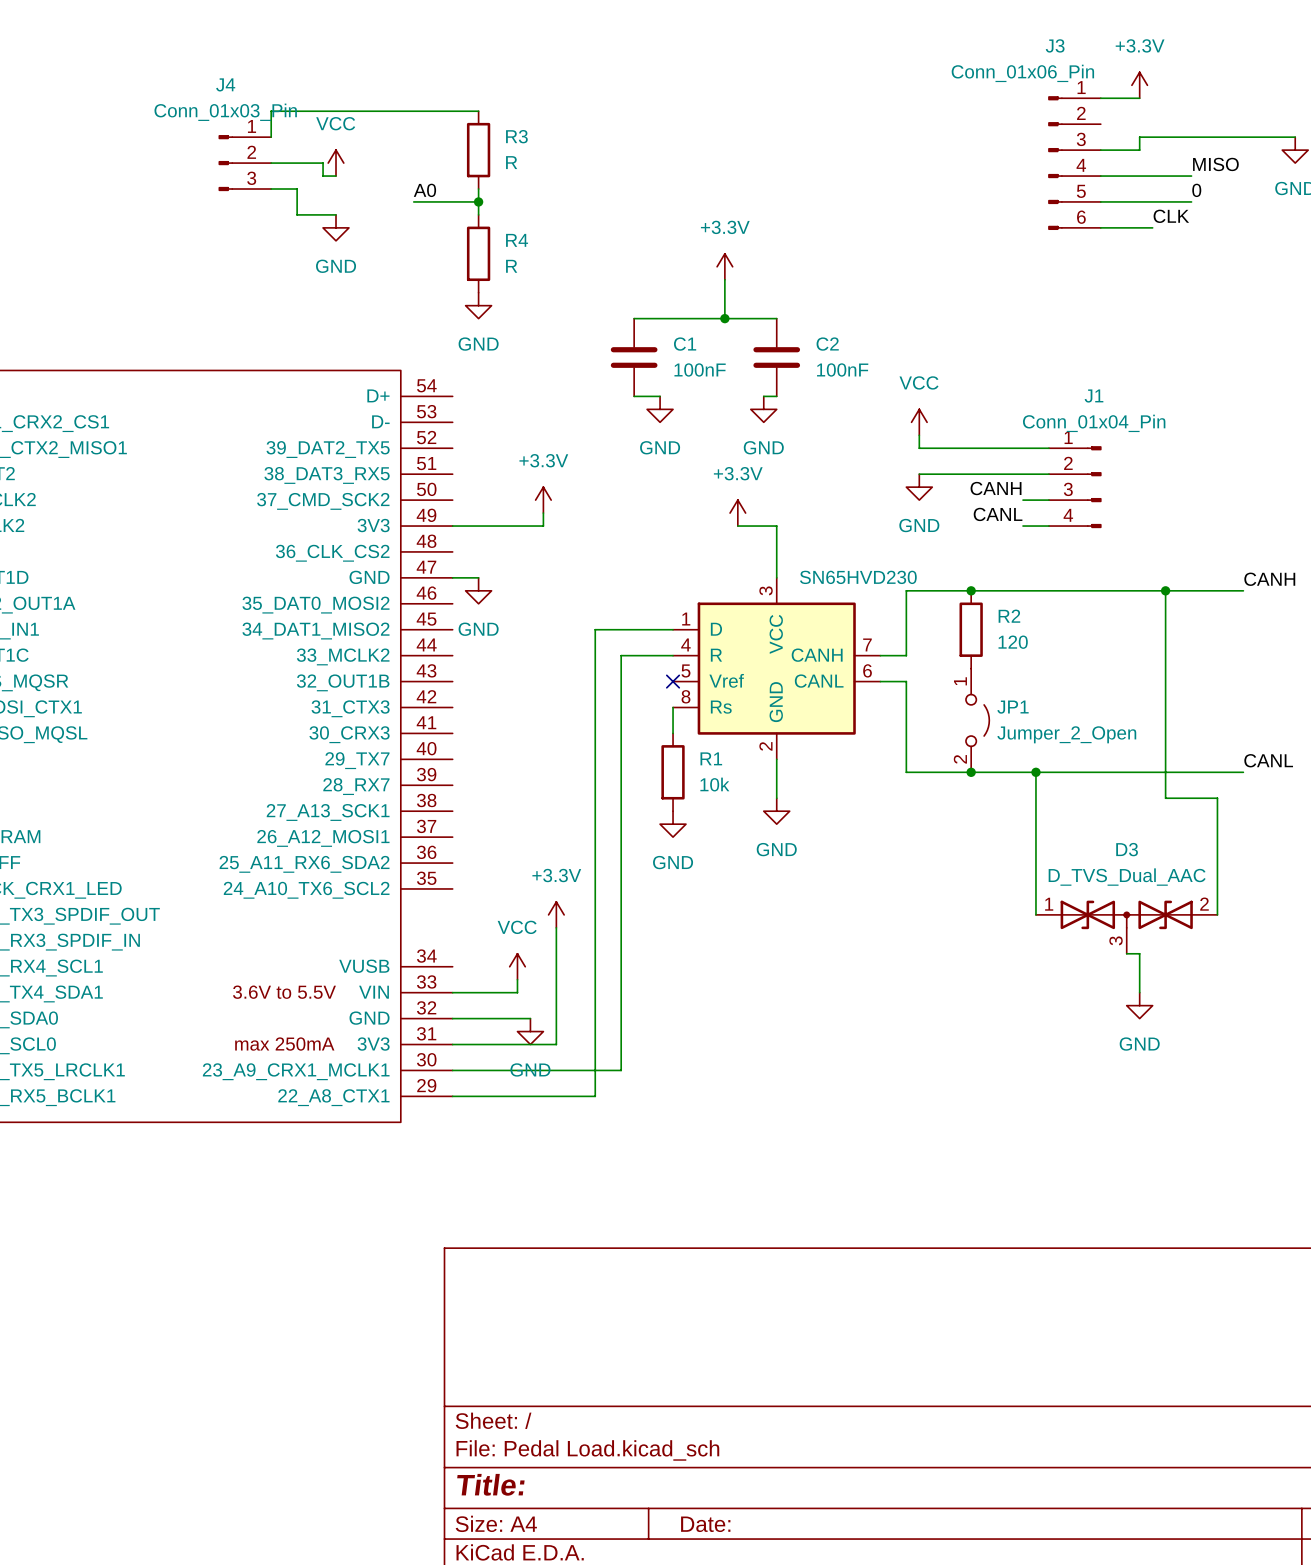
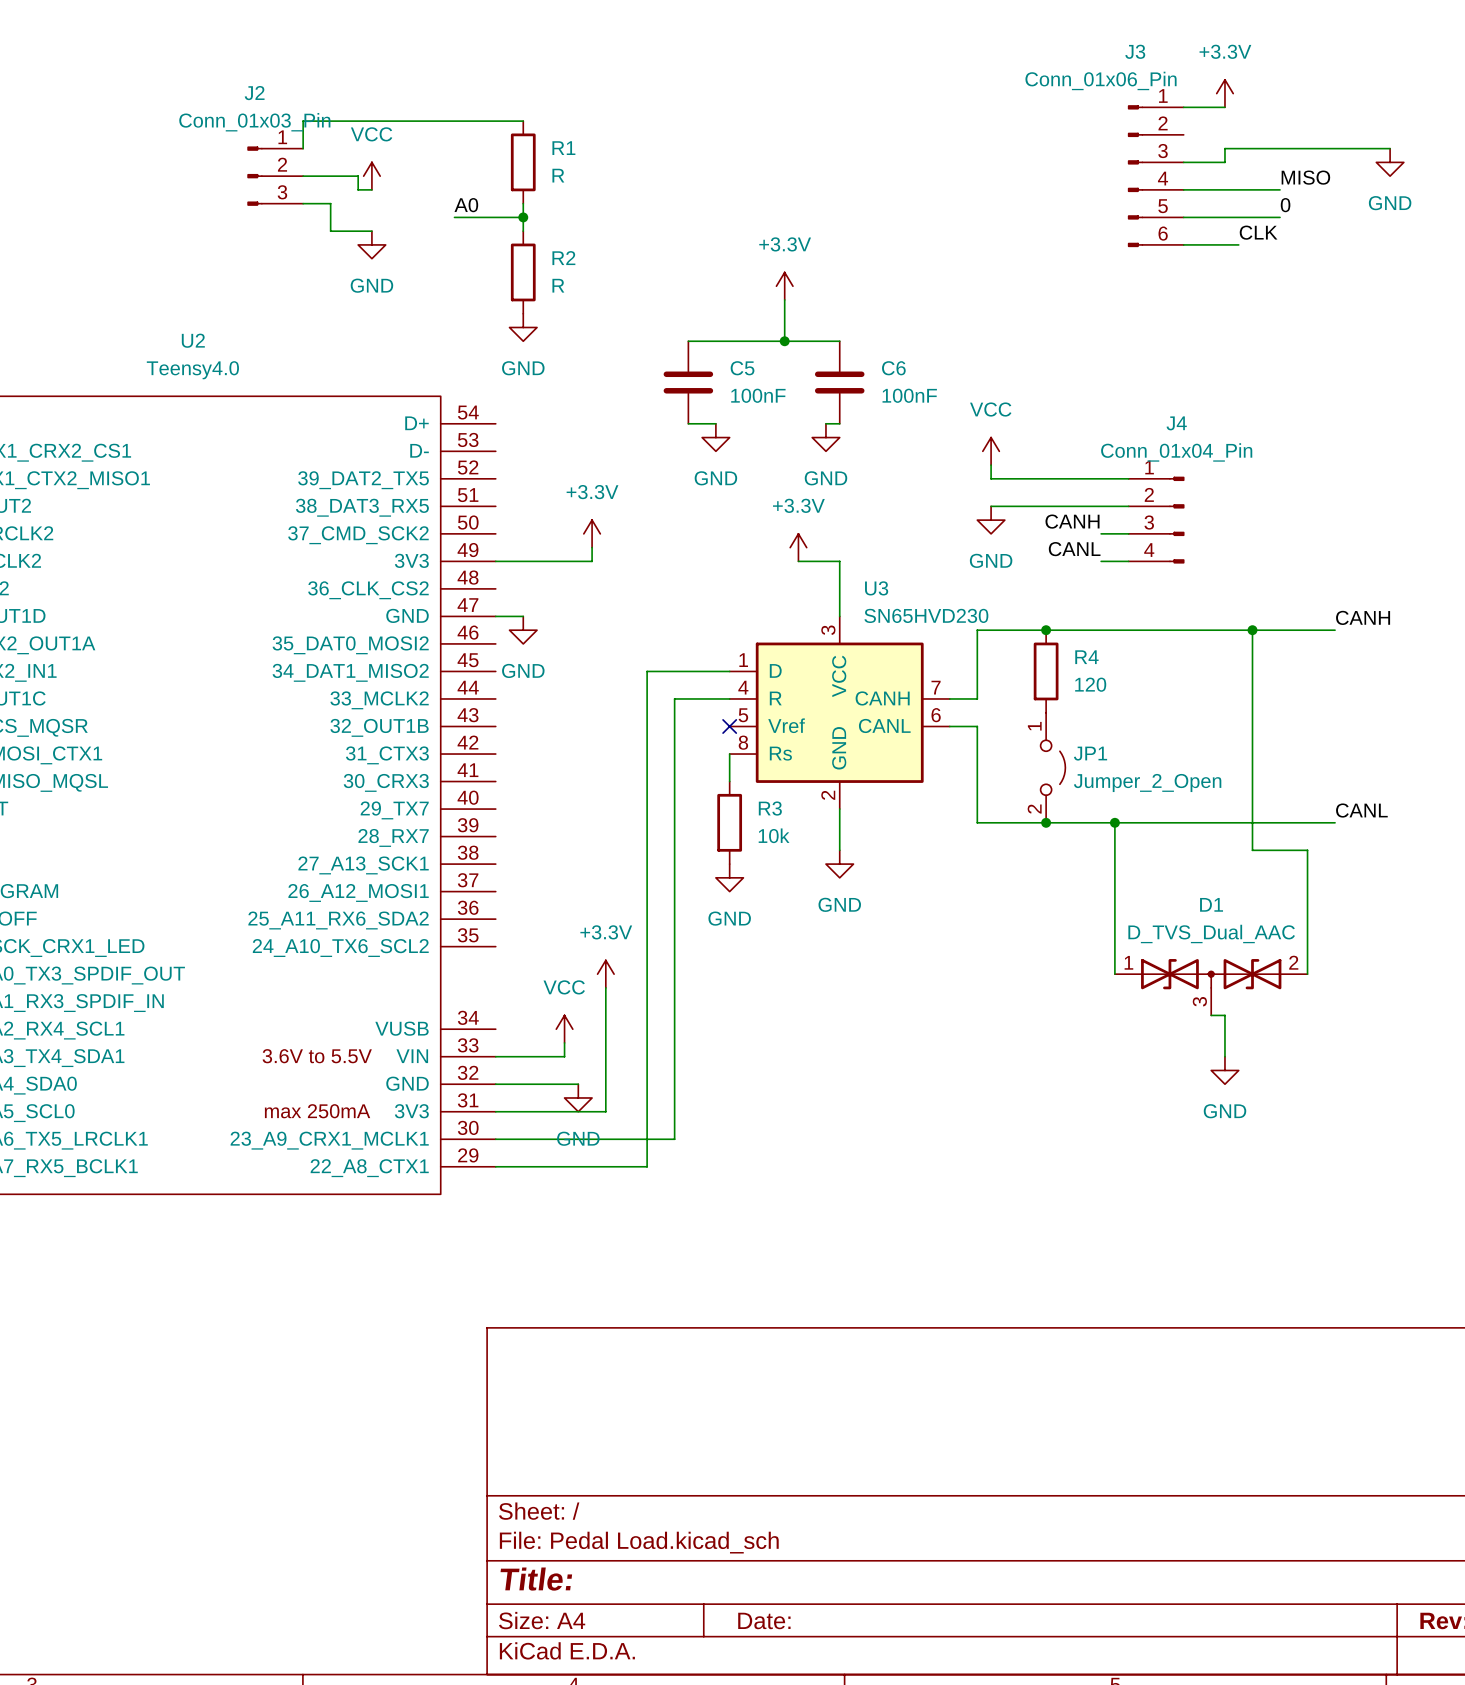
J4 name: J4 (225, 84) -> J2 (254, 93)
R3 name: R3 (516, 136) -> R1 (563, 148)
R4 name: R4 (517, 240) -> R2 (563, 258)
U2 name: none -> U2 (193, 340)
C1 name: C1 (685, 344) -> C5 (742, 368)
C2 name: C2 (827, 344) -> C6 (893, 368)
U2 value: none -> Teensy4.0 (192, 370)
J1 name: J1 (1093, 396) -> J4 (1176, 423)
U3 name: none -> U3 (876, 588)
R2 name: R2 (1009, 616) -> R4 (1086, 657)
R1 name: R1 (711, 758) -> R3 (770, 808)
D3 name: D3 (1127, 849) -> D1 (1211, 904)

